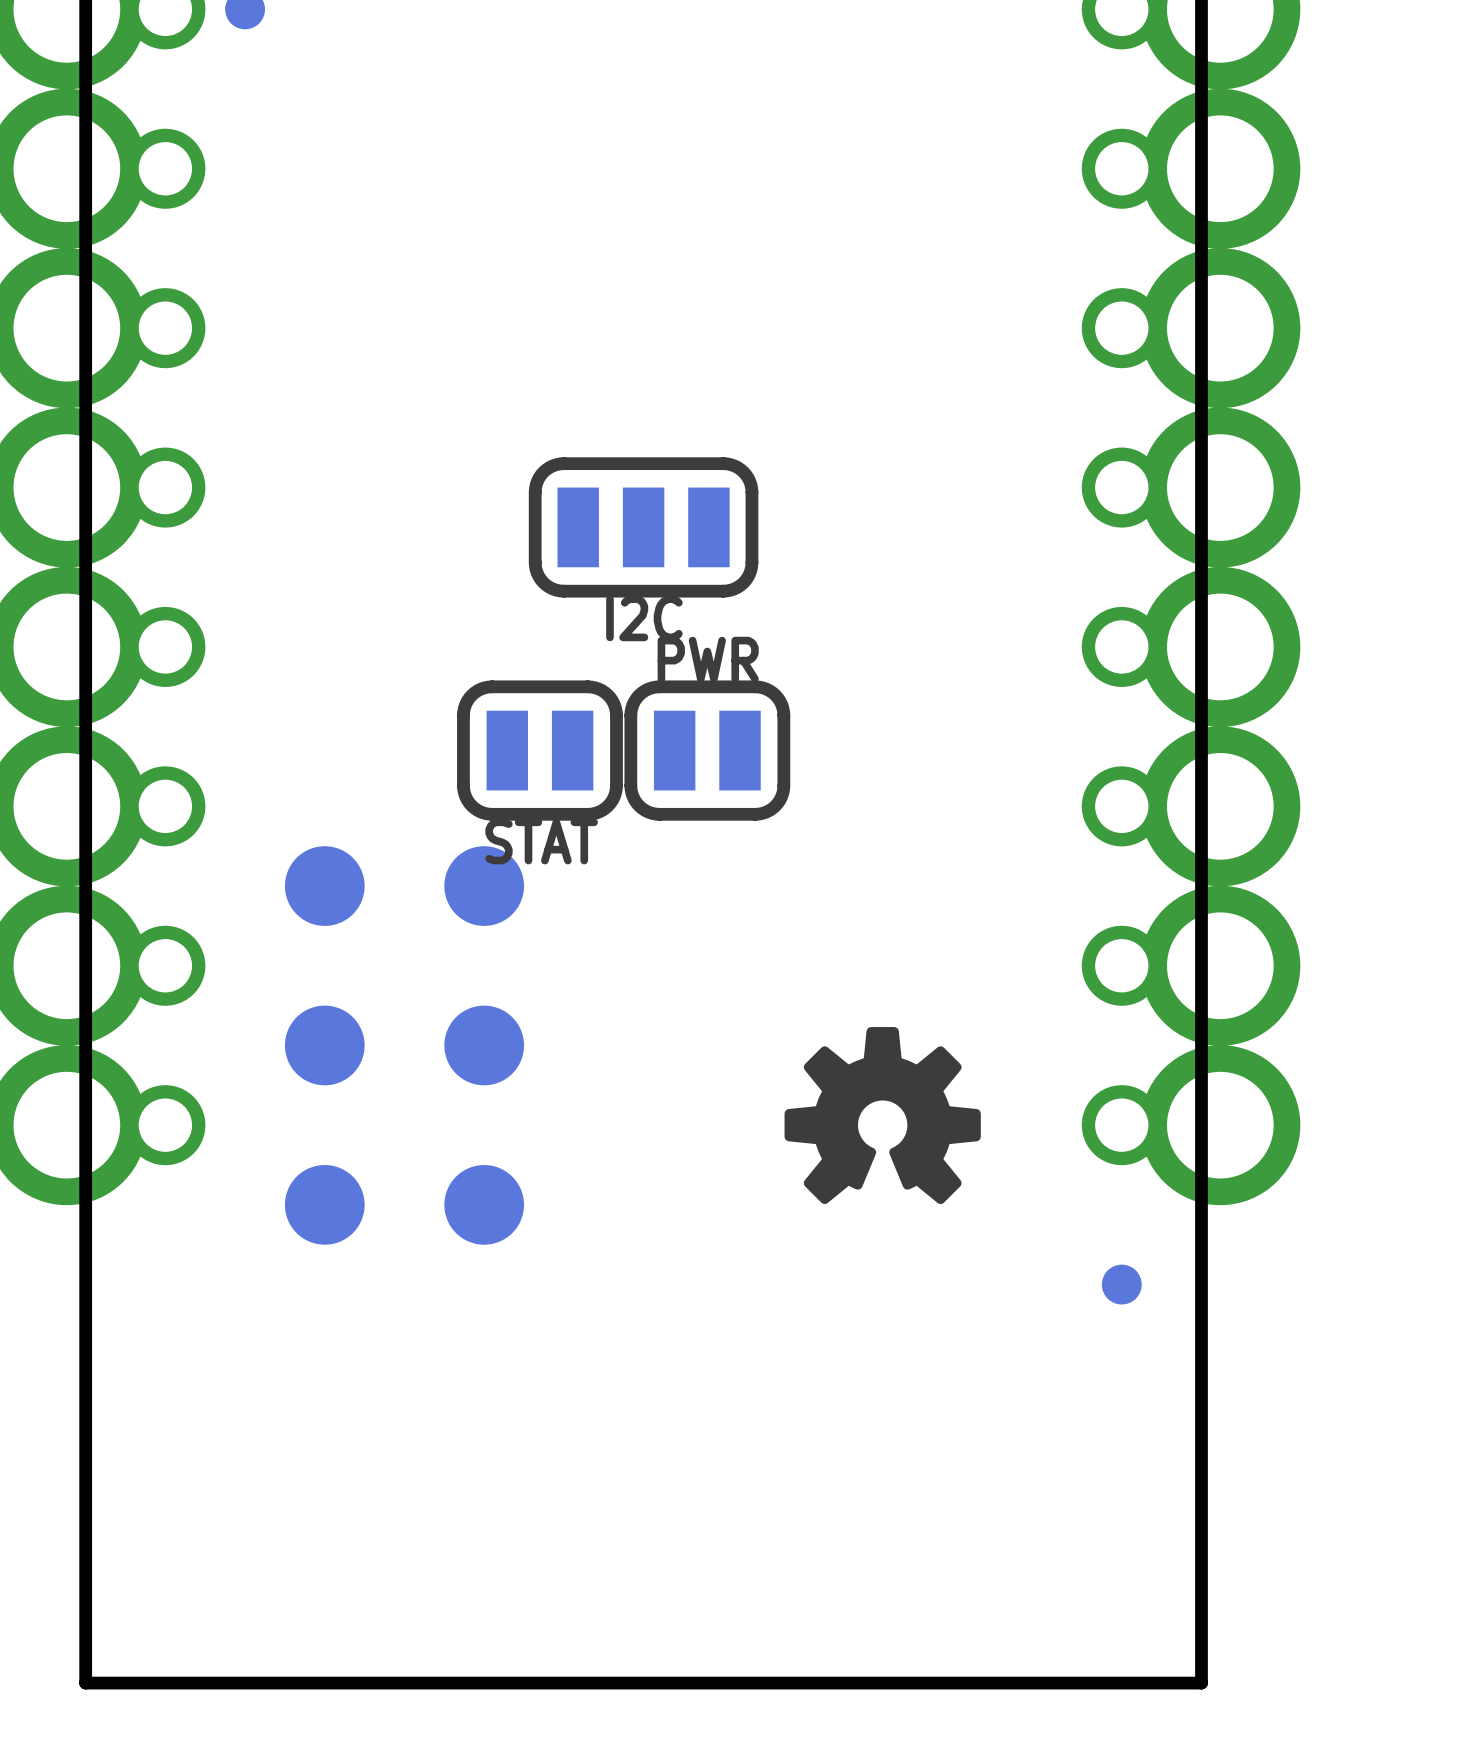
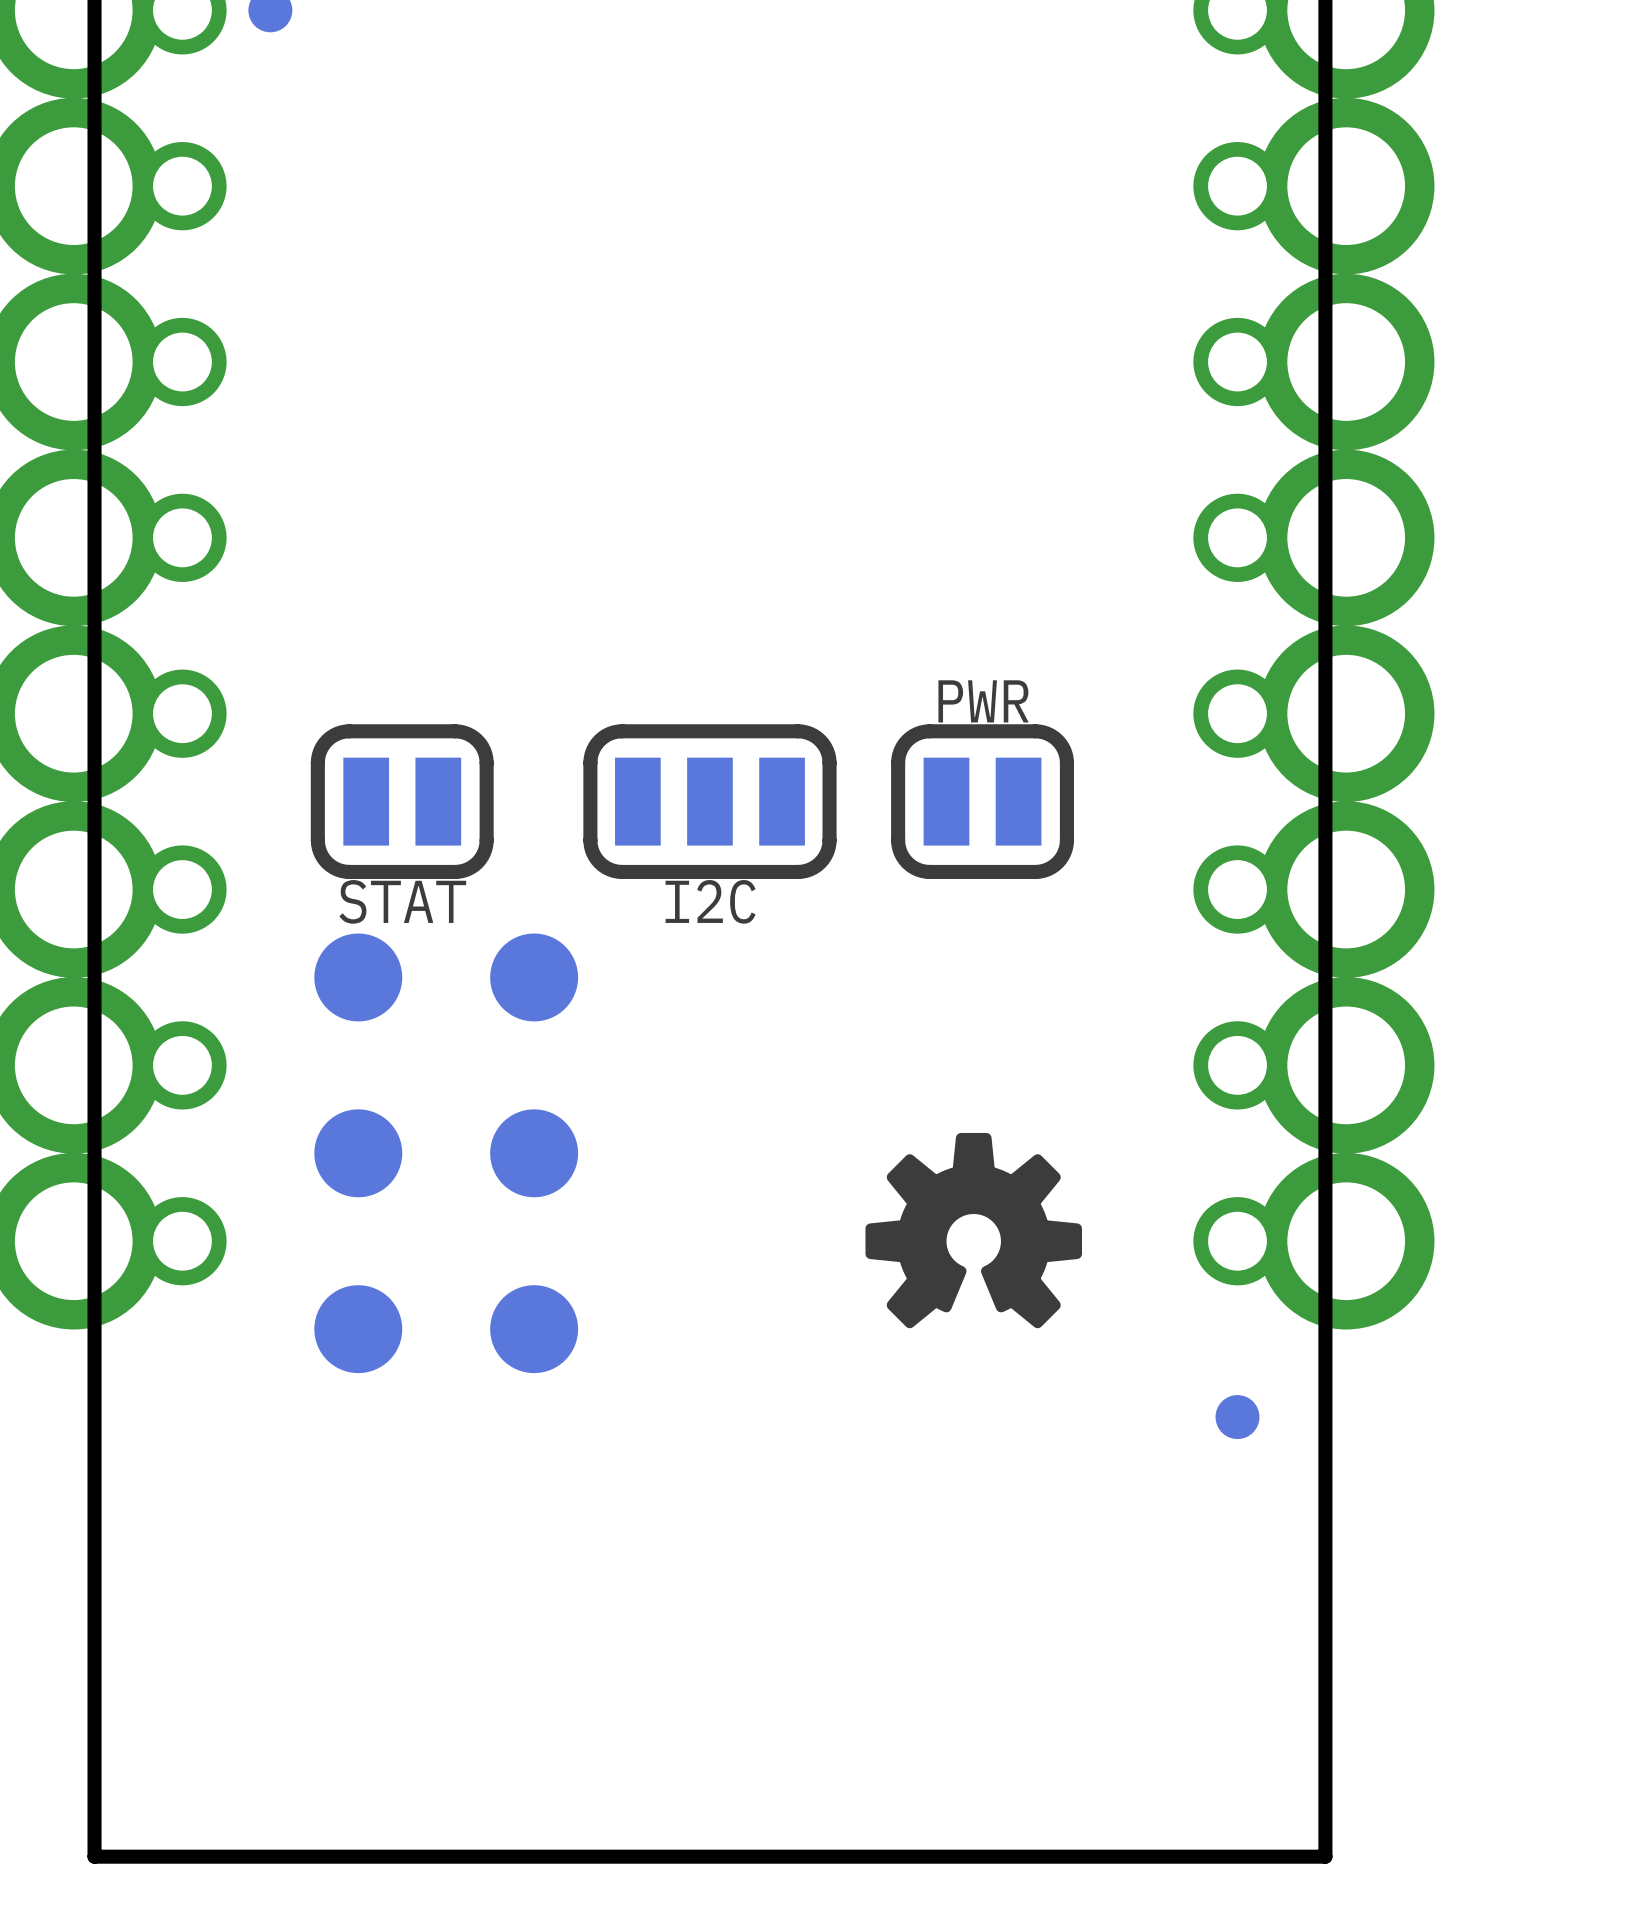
I2C position: (643, 527) -> (709, 801)
STAT position: (539, 750) -> (402, 801)
PWR position: (707, 750) -> (982, 801)

